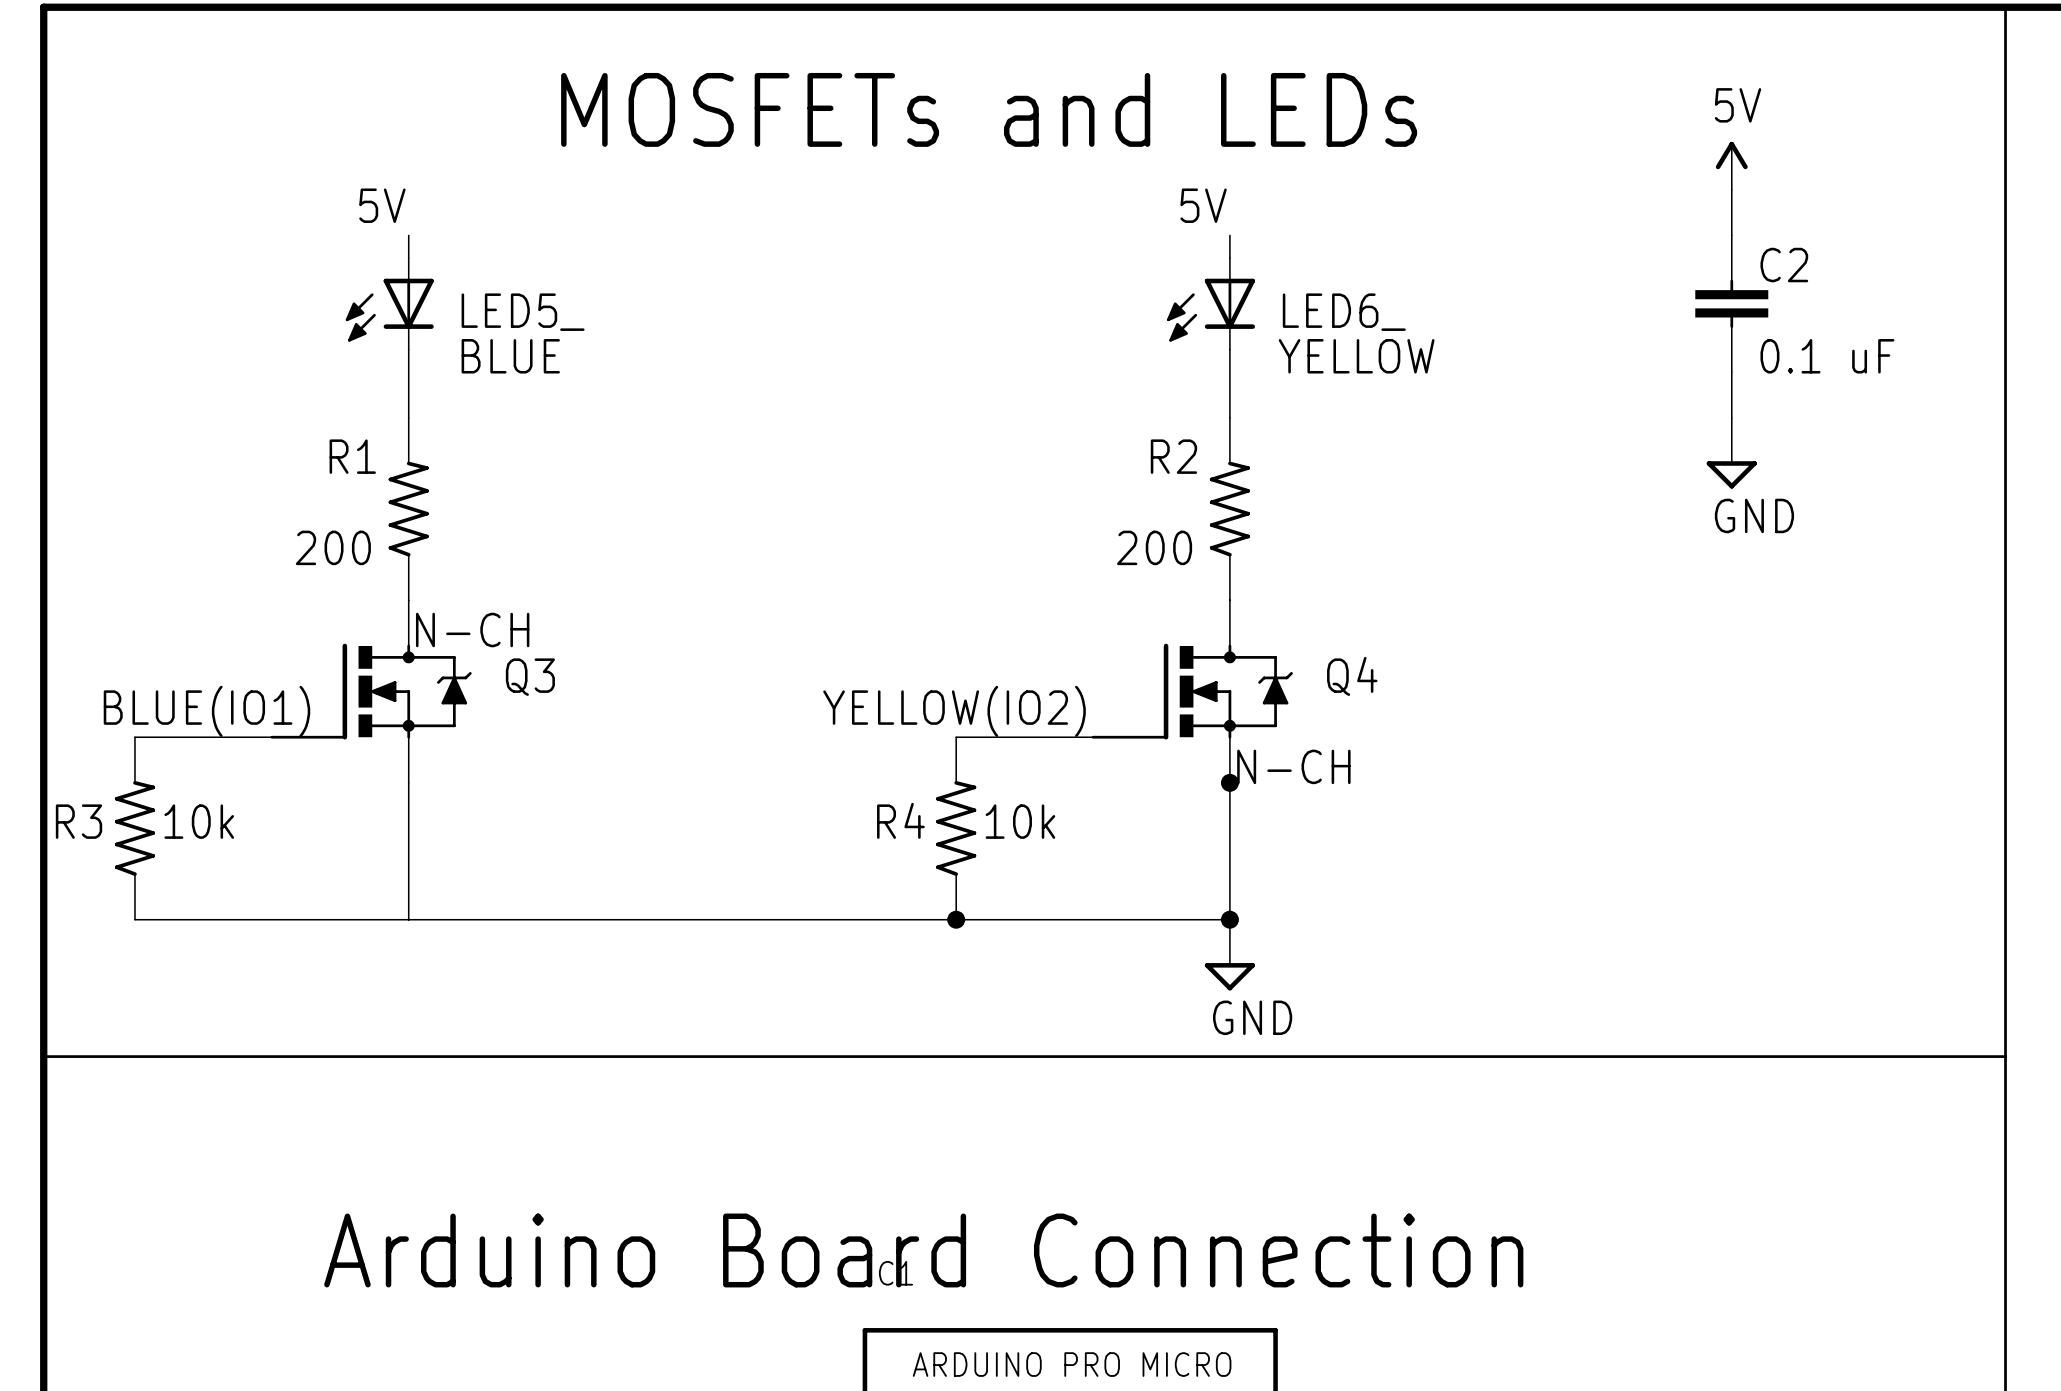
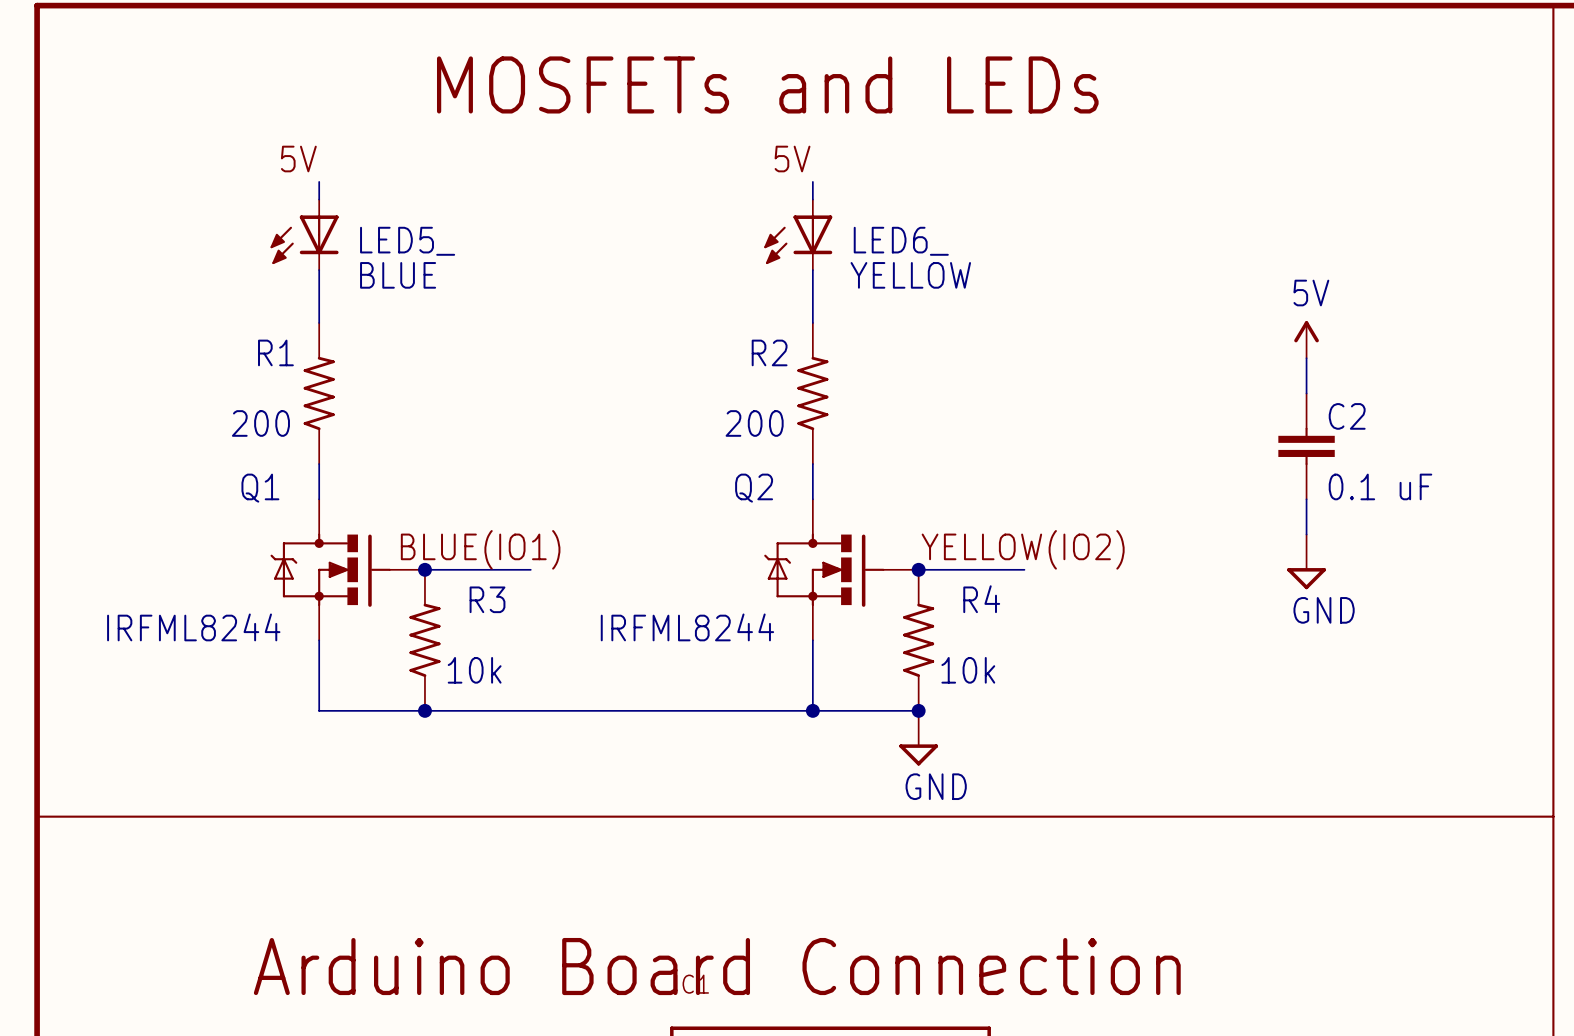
power symbol position: 5V (1731, 165) -> 5V (1306, 339)
wire: (1731, 189) (1731, 235) -> (1306, 358) (1306, 393)
label position: 5V (1203, 205) -> 5V (792, 159)
wire: (1229, 235) (1229, 258) -> (812, 181) (812, 199)
LED6_ position: (1210, 303) -> (798, 234)
C2 position: (1731, 303) -> (1306, 446)
wire: (1229, 349) (1229, 417) -> (812, 270) (812, 322)
wire: (1731, 372) (1731, 417) -> (1306, 499) (1306, 534)
power symbol: GND (1731, 453) -> none
R2 position: (1229, 509) -> (812, 393)
wire: none -> (812, 464) (812, 499)
Q3: N-CH (371, 691) -> none
Q4: N-CH (1192, 691) -> none
label position: BLUE(IO1) (206, 711) -> BLUE(IO1) (480, 549)
label position: YELLOW(IO2) (954, 711) -> YELLOW(IO2) (1023, 549)
power symbol: none -> GND (1306, 561)
wire: (134, 737) (271, 737) -> (424, 569) (530, 569)
Q1: none -> IRFML8244 (347, 569)
junction: none -> (424, 569)
wire: (956, 737) (1093, 737) -> (918, 569) (1024, 569)
Q2: none -> IRFML8244 (841, 569)
wire: (1229, 782) (1229, 919) (1184, 919) -> none
junction position: (1229, 782) -> (918, 569)
R4 name position: R4 (900, 820) -> R4 (981, 599)
R3 name position: R3 (79, 821) -> R3 (487, 599)
R3 value position: 10k (199, 821) -> 10k (474, 670)
R4 value position: 10k (1020, 821) -> 10k (968, 670)
R3 position: (134, 828) -> (424, 640)
R4 position: (956, 828) -> (918, 640)
wire: none -> (812, 640) (812, 710)
wire: (134, 919) (408, 919) -> none
junction: none -> (424, 710)
junction: (956, 919) -> none
junction: none -> (812, 710)
junction position: (1229, 919) -> (918, 710)
power symbol position: GND (1229, 955) -> GND (918, 738)

